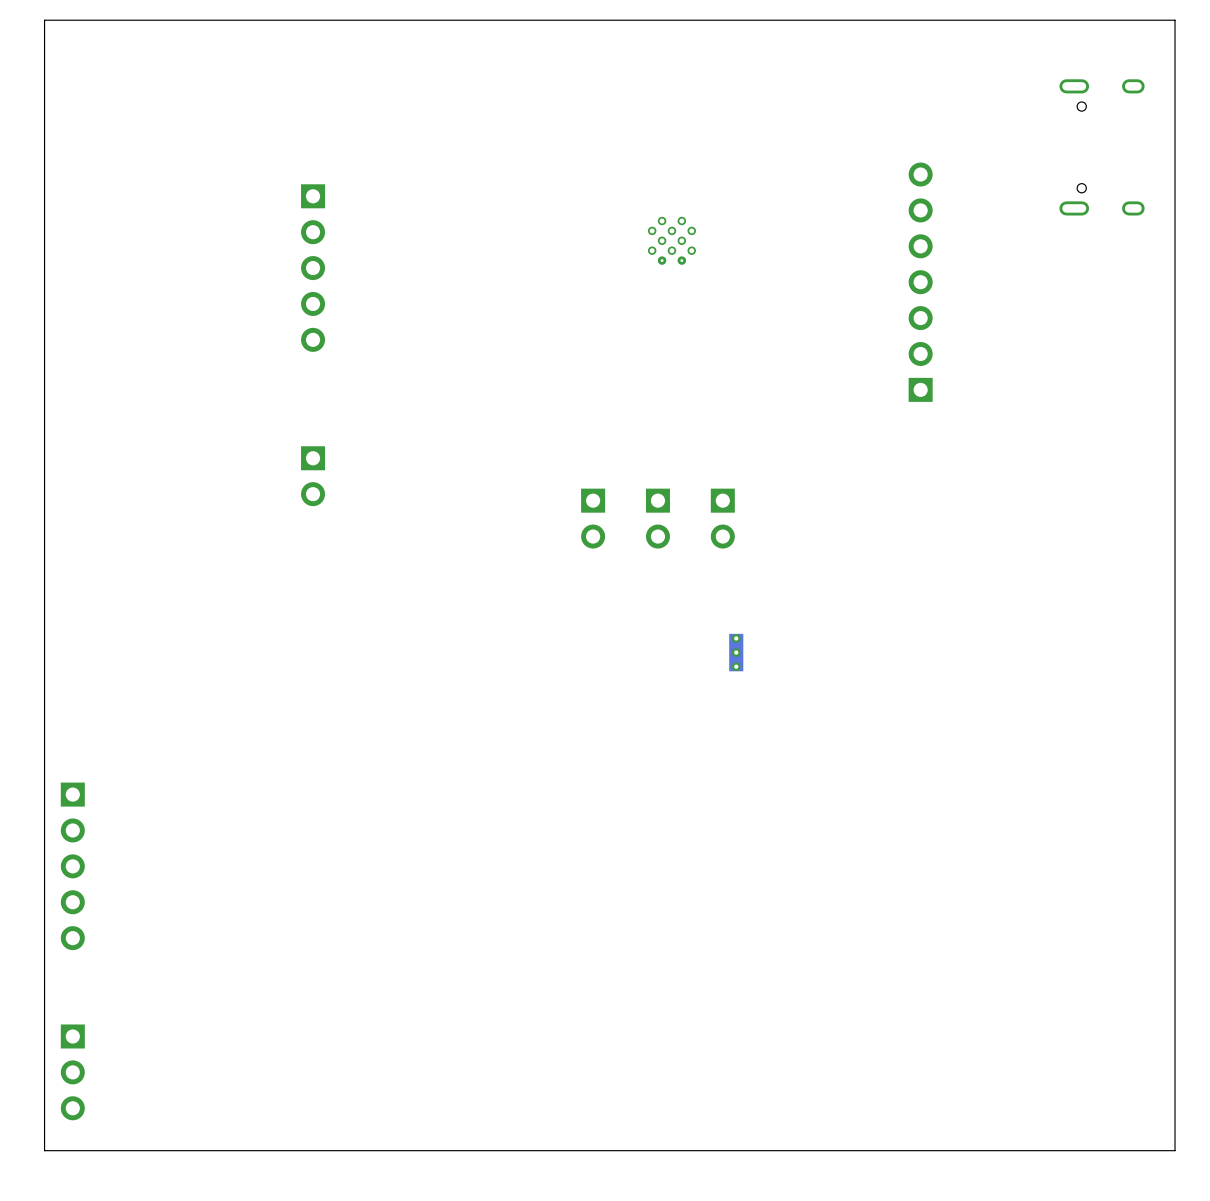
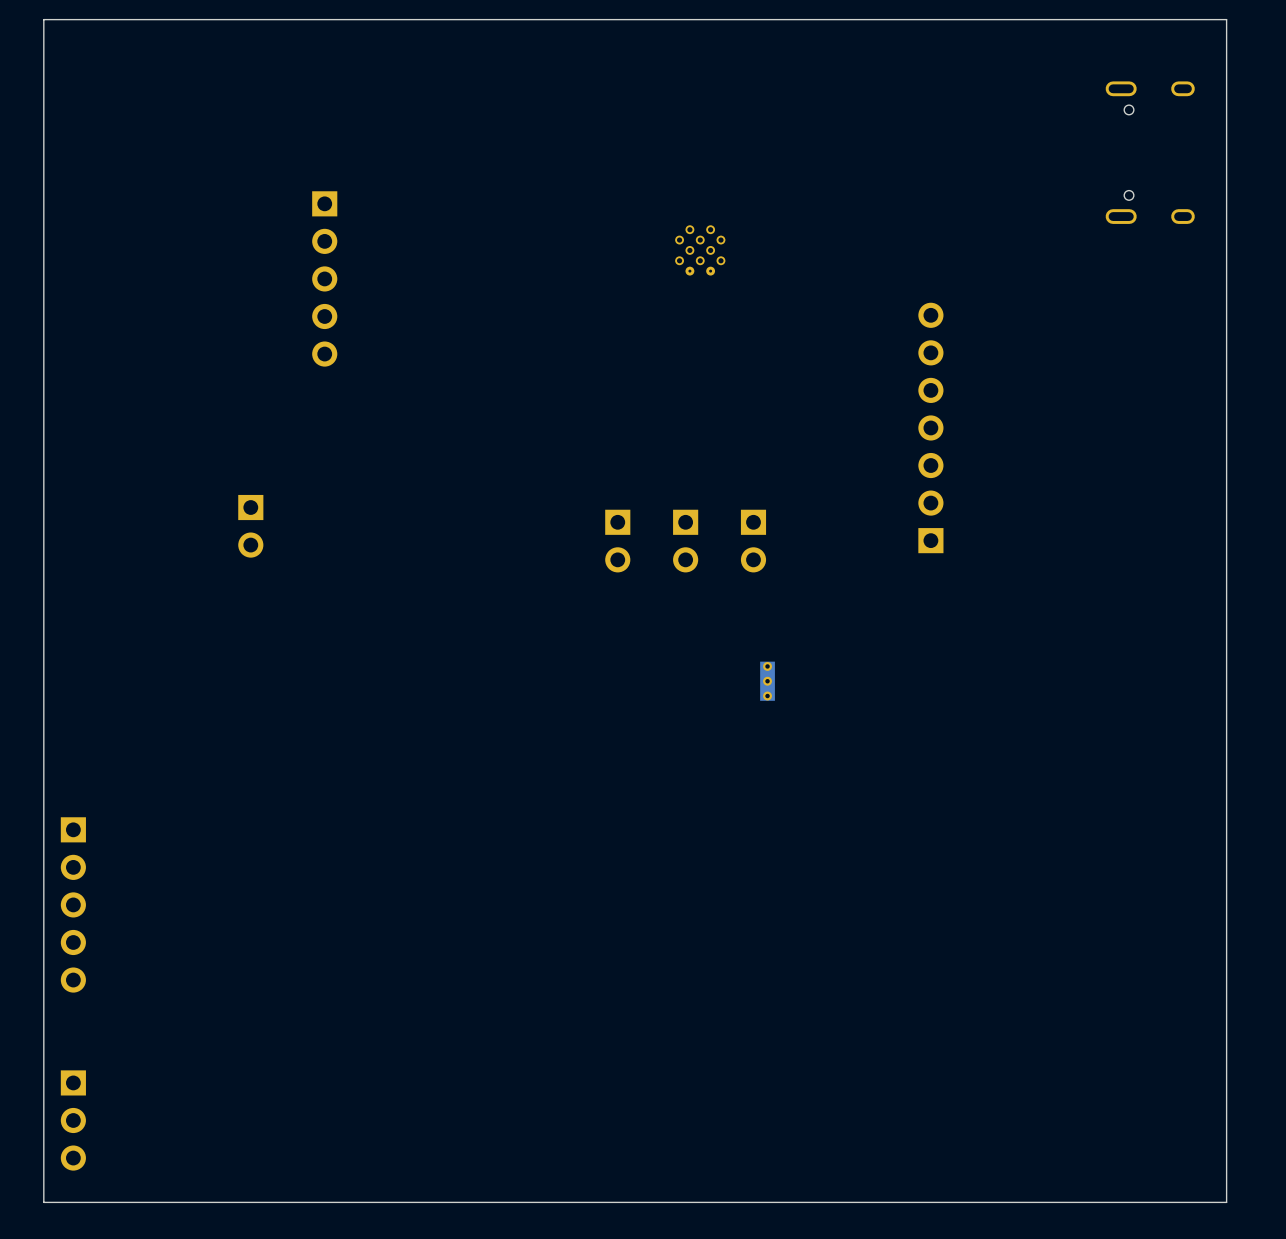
part position: (920, 282) -> (930, 427)
part position: (313, 476) -> (250, 526)

